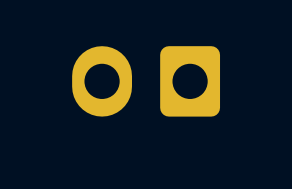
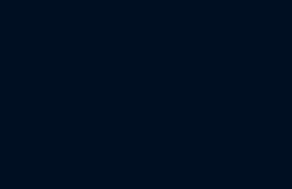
part: (146, 81) -> none

